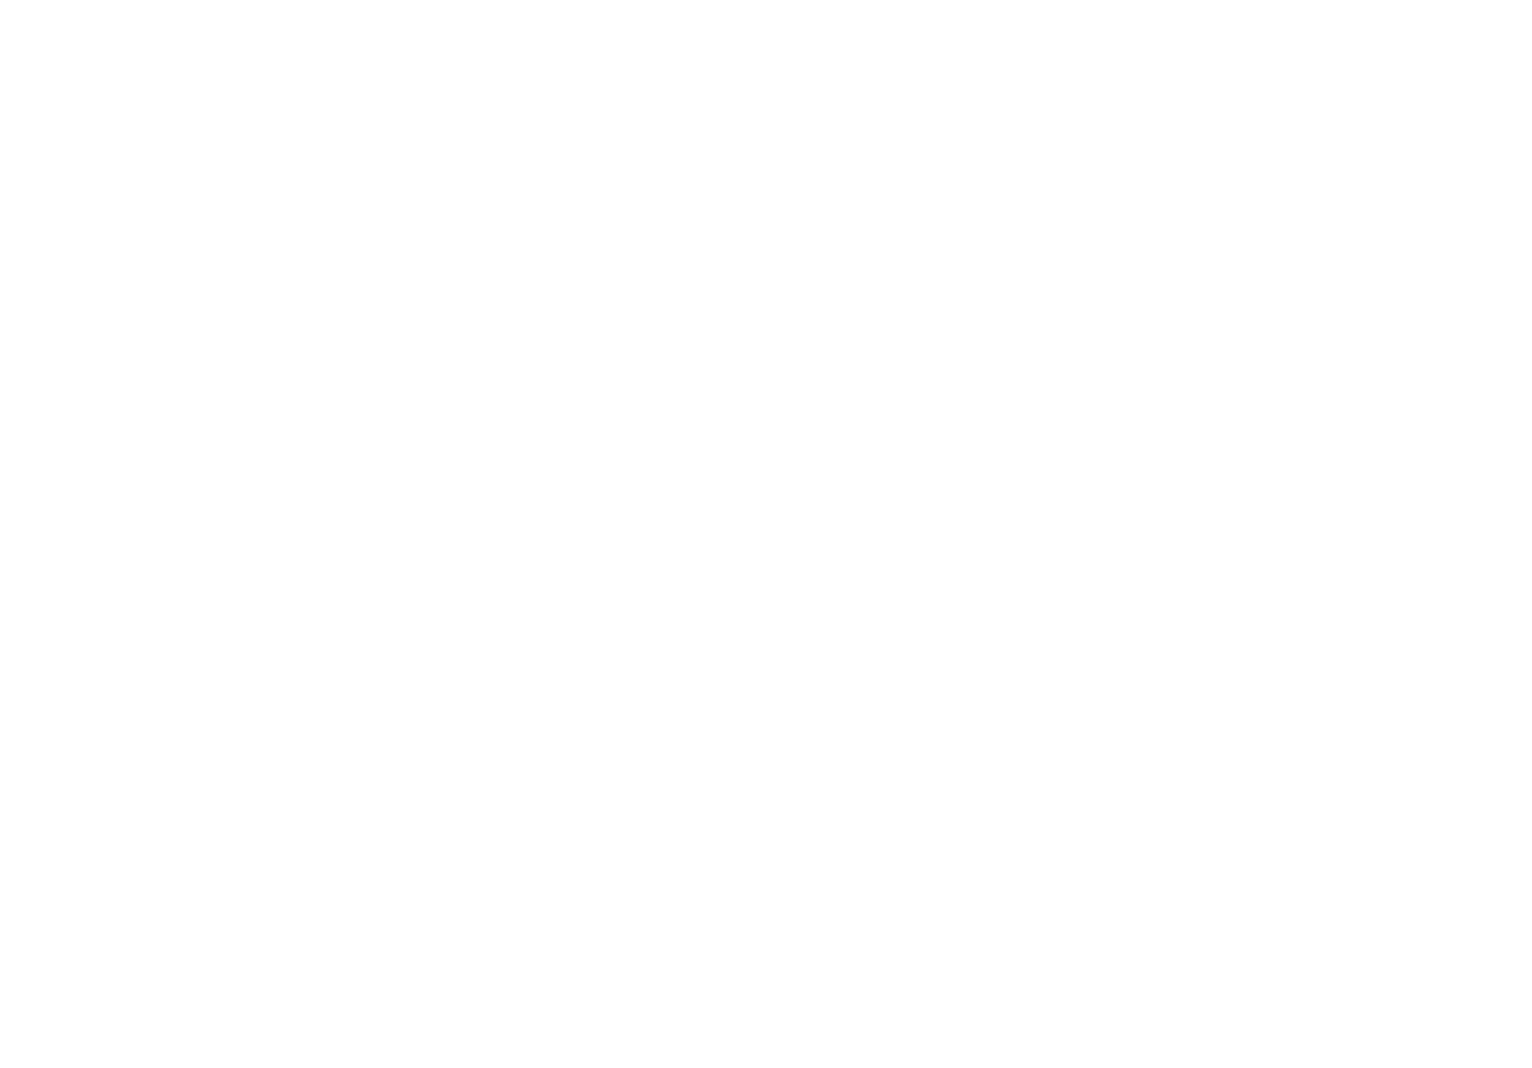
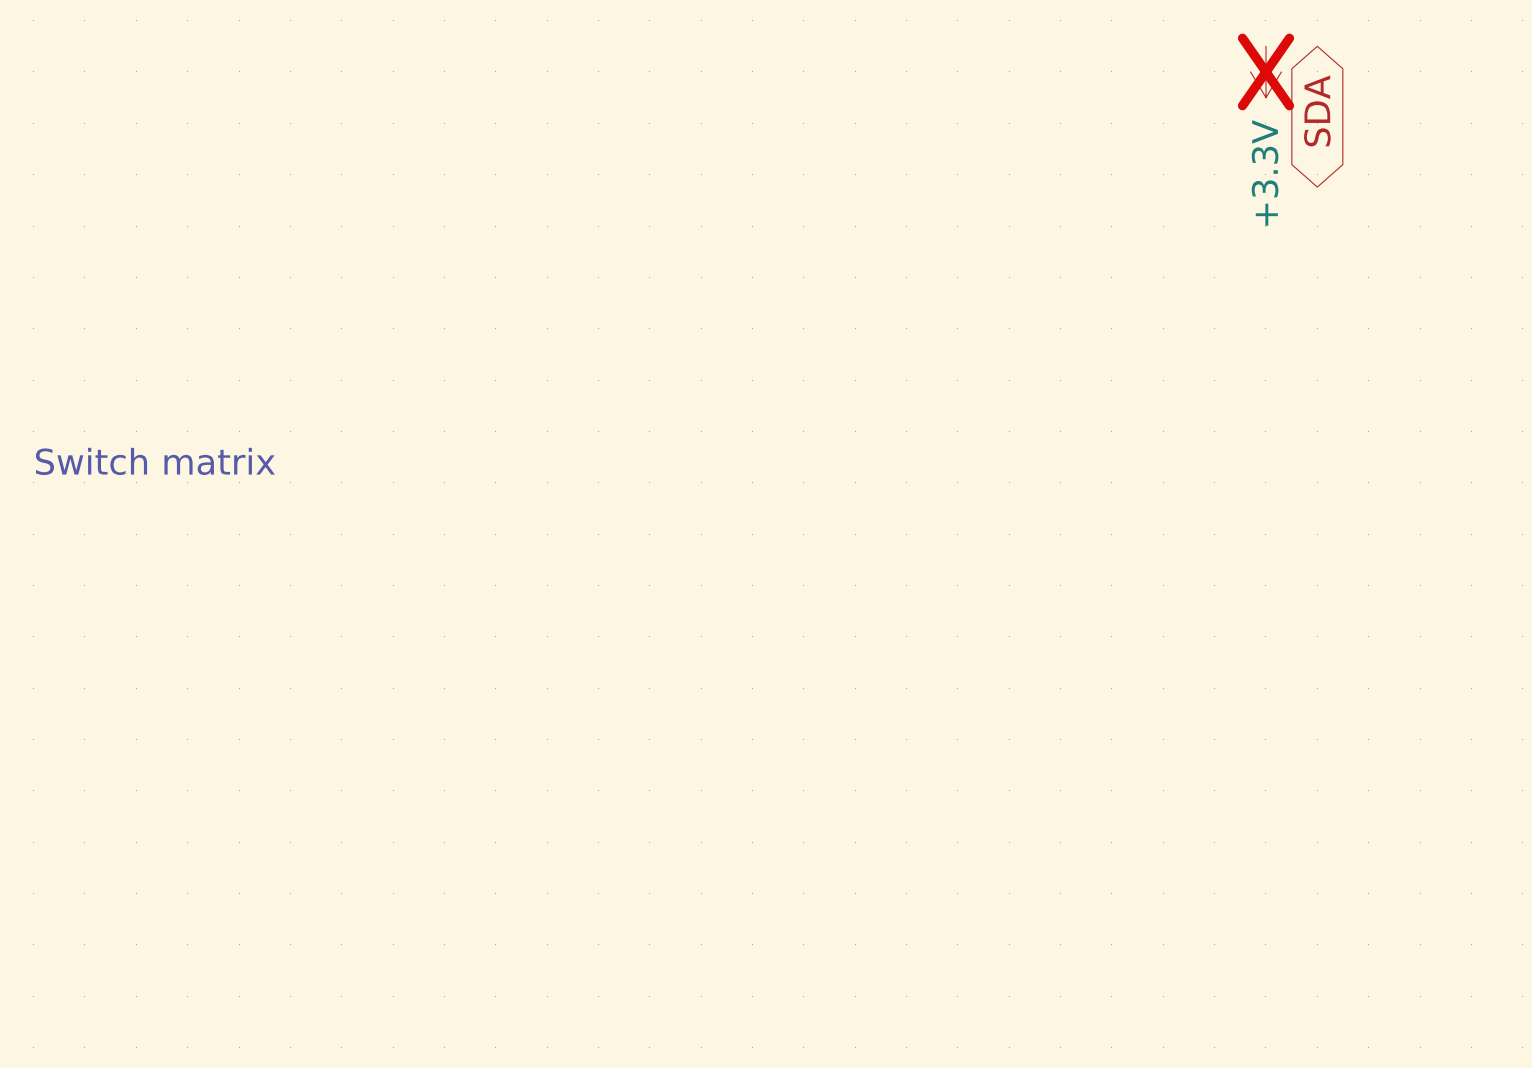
power symbol: none -> +3.3V (1265, 71)
global label: none -> SDA (1317, 110)
text: none -> Switch matrix (155, 461)

